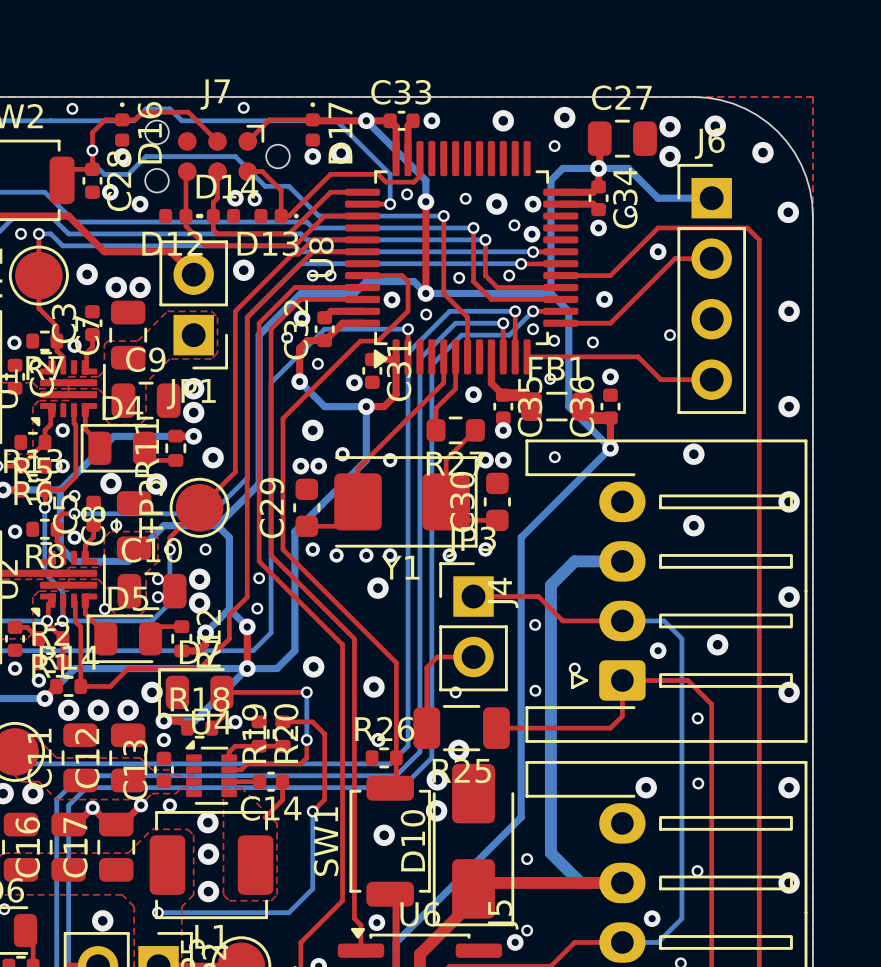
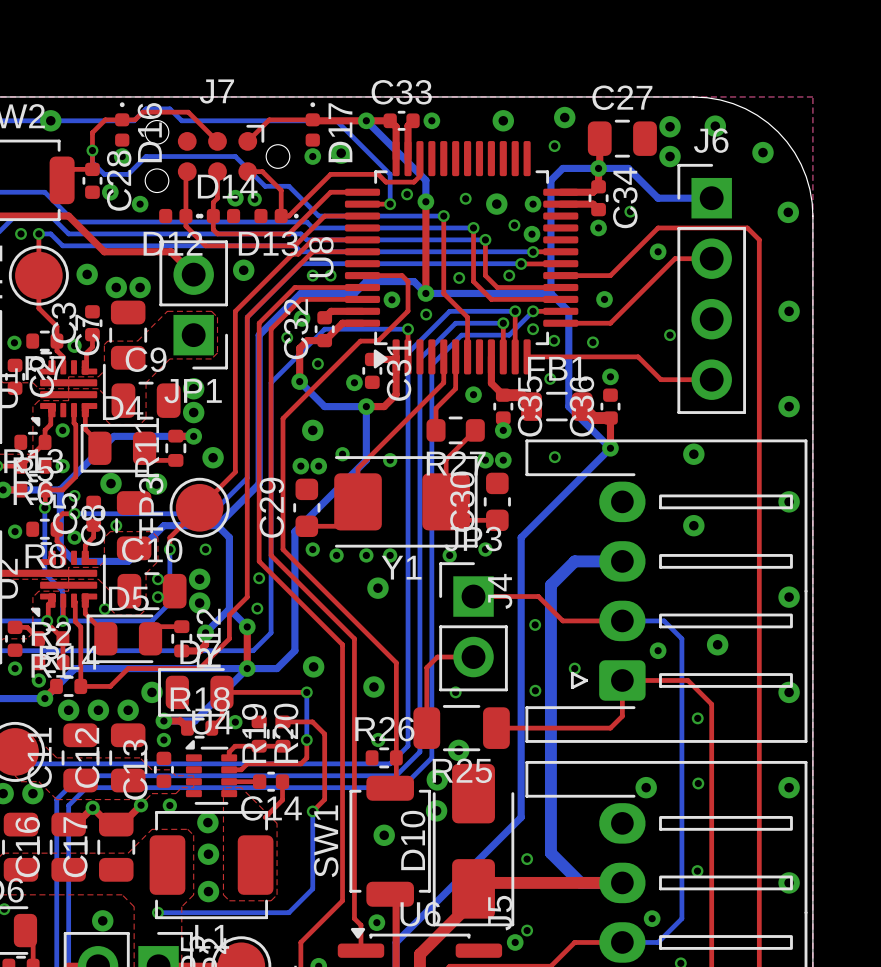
via: (243, 107) -> none
via: (72, 108) -> none
via: none -> (50, 120)

